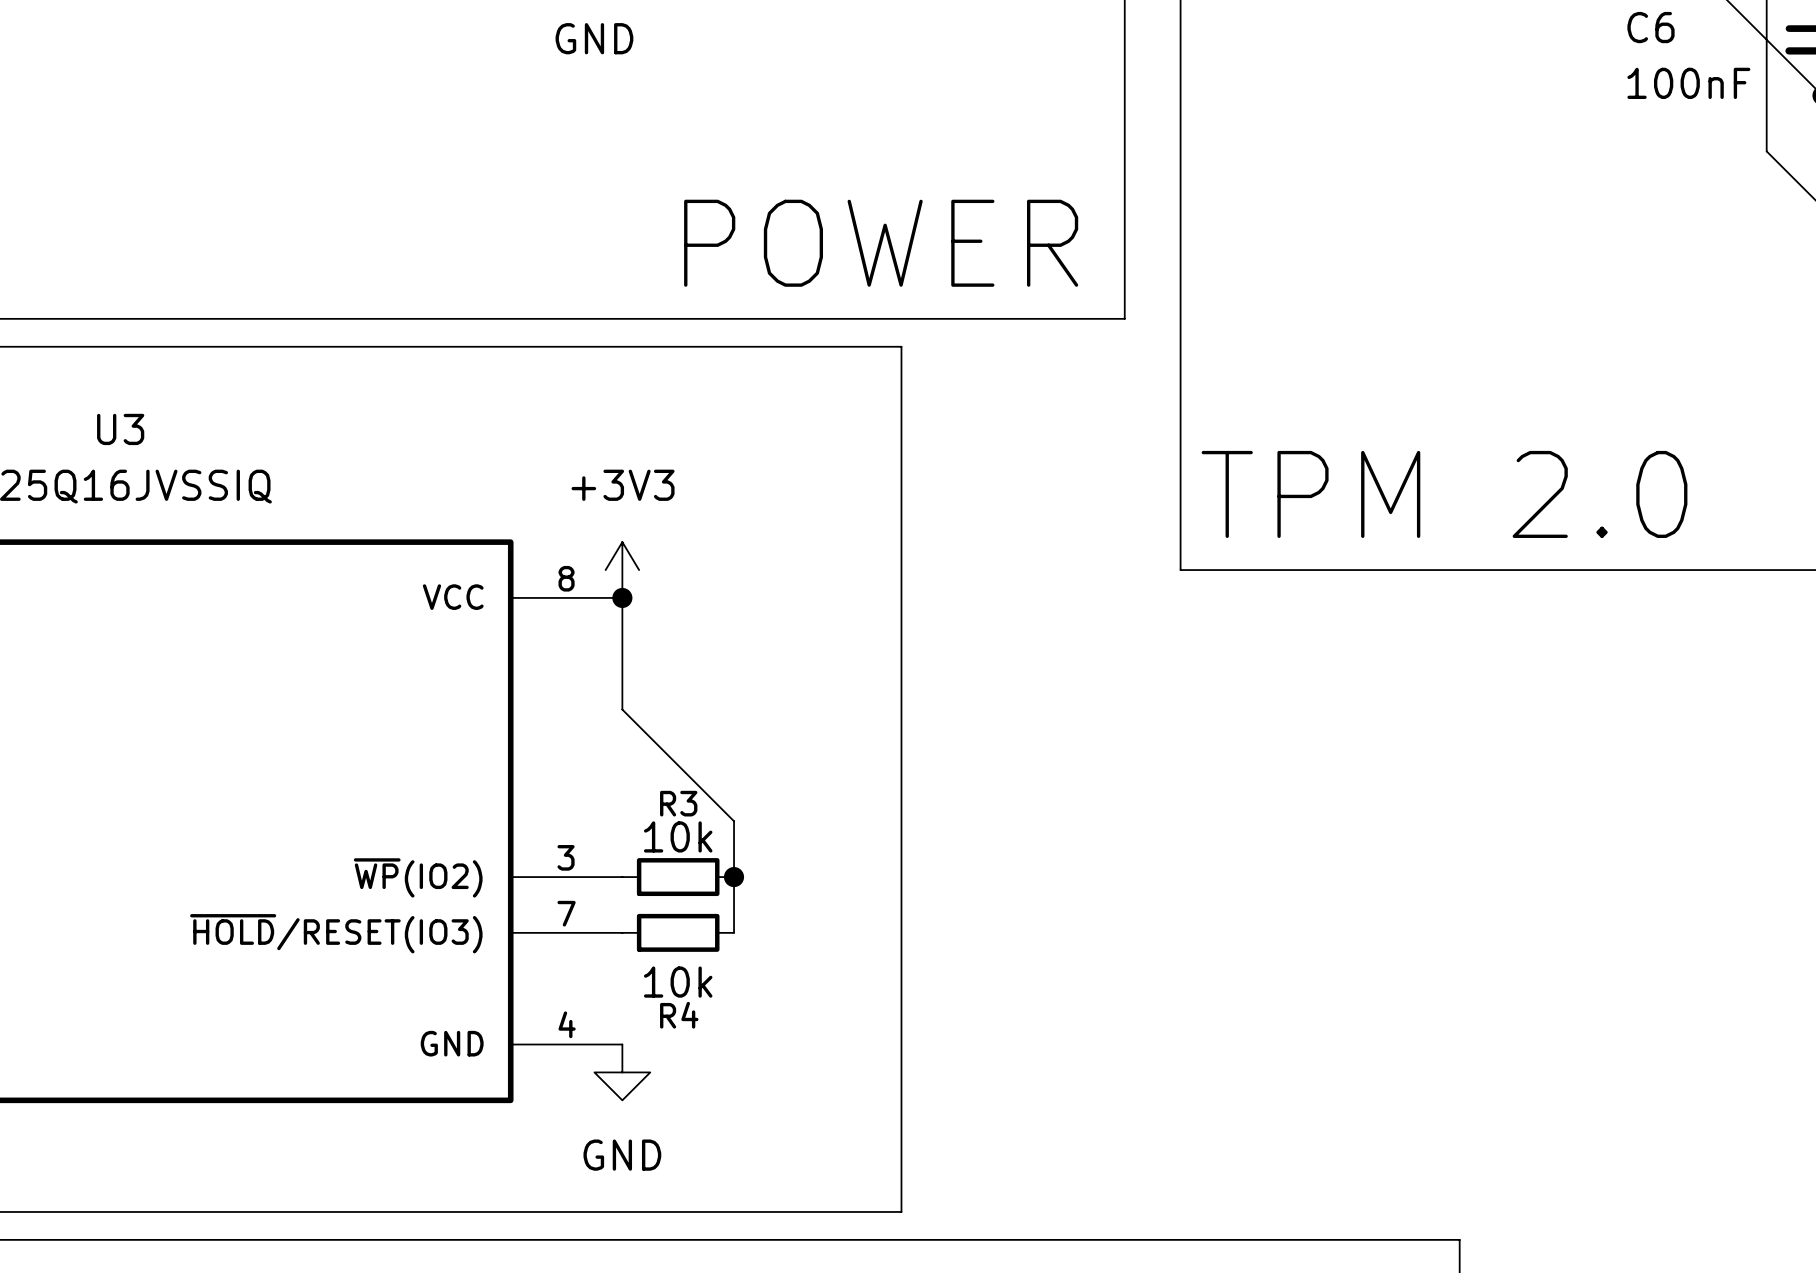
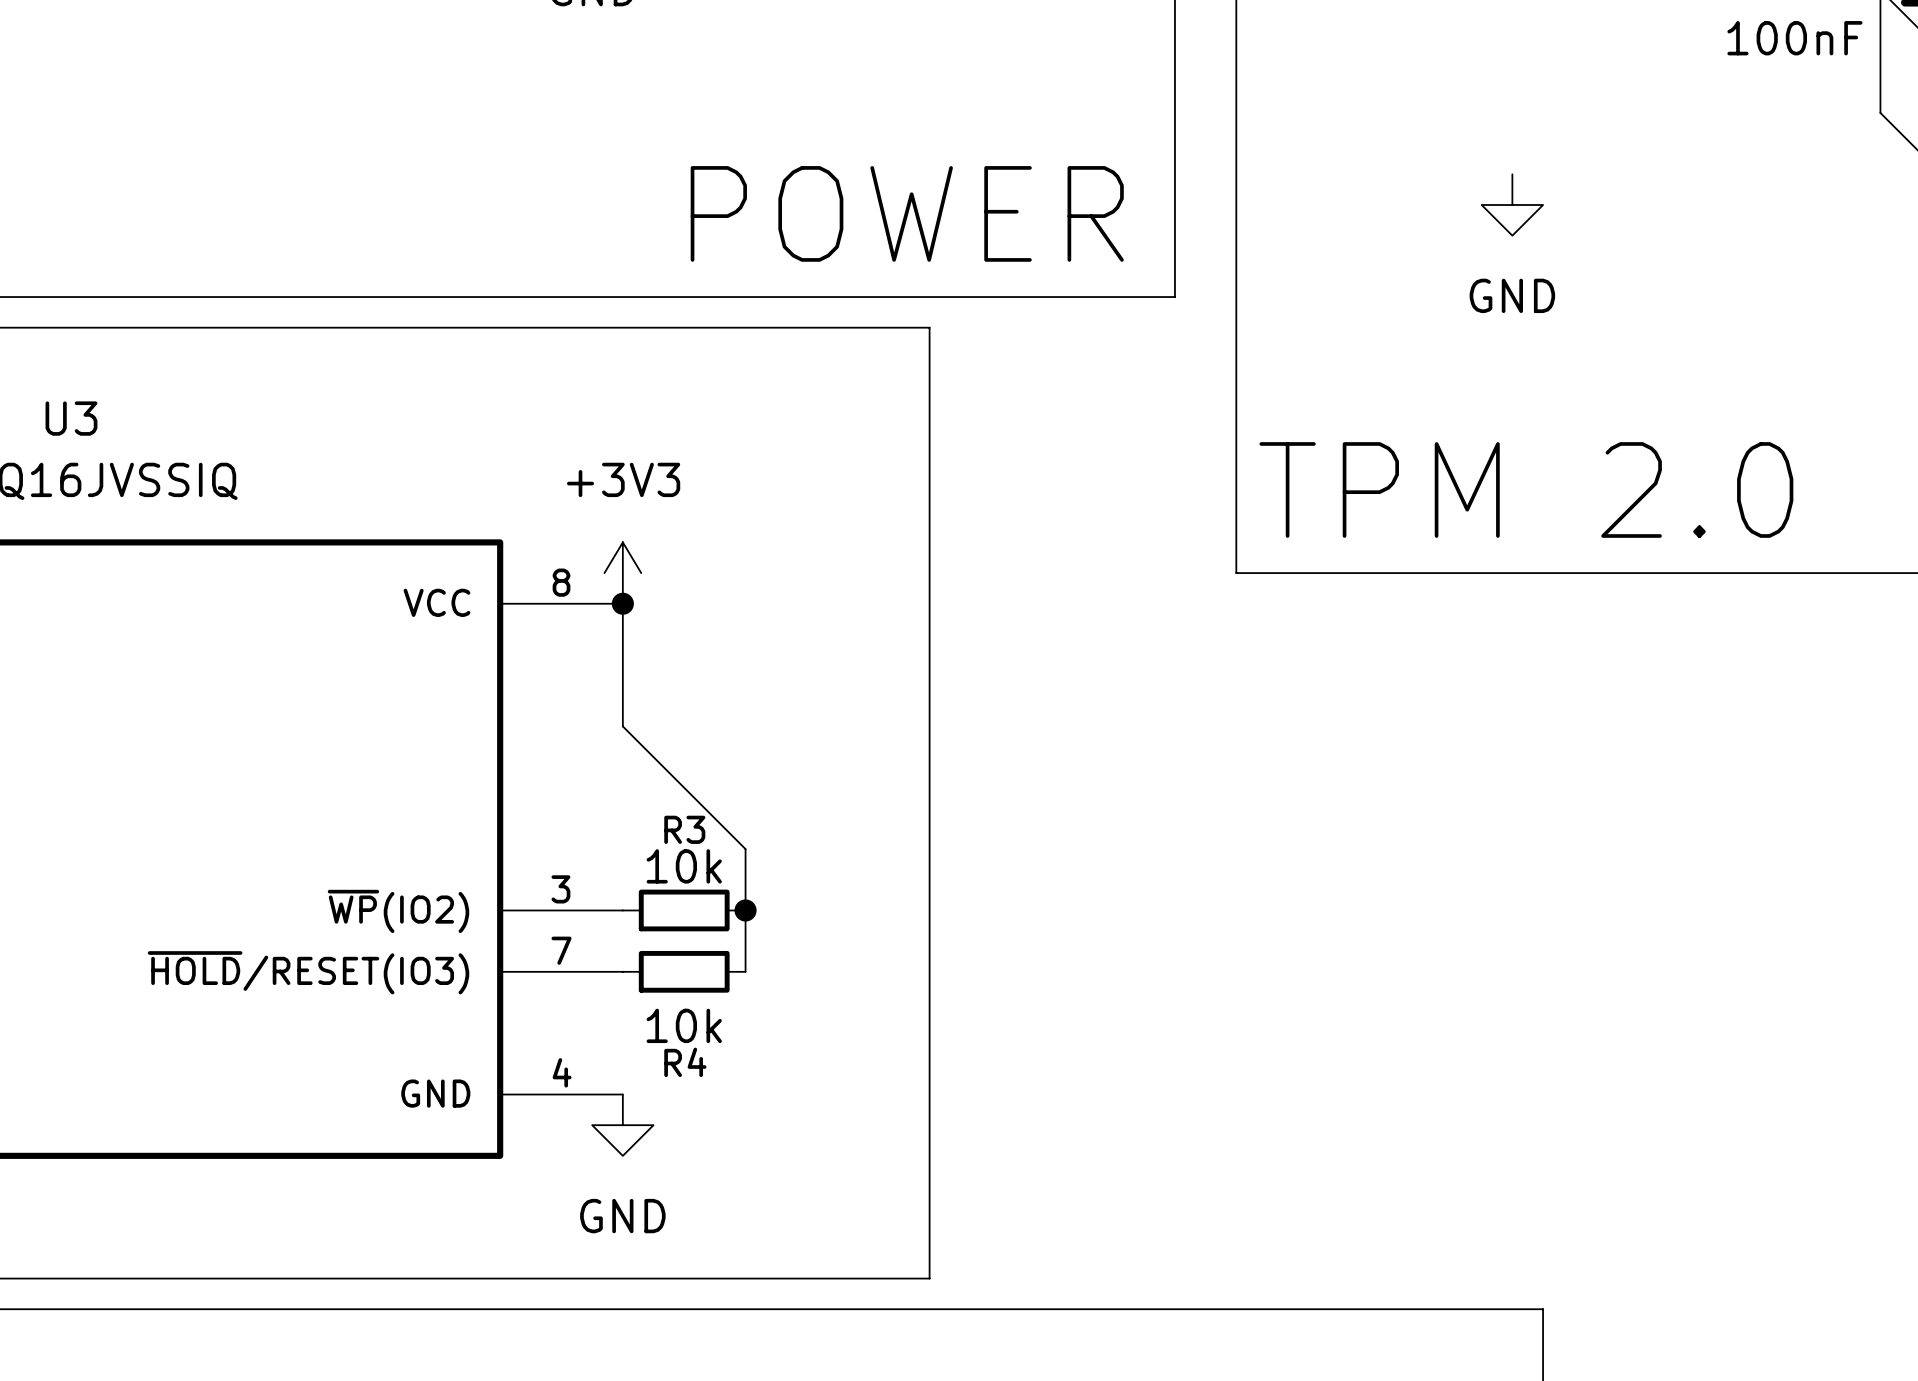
power symbol: none -> GND (1512, 205)

